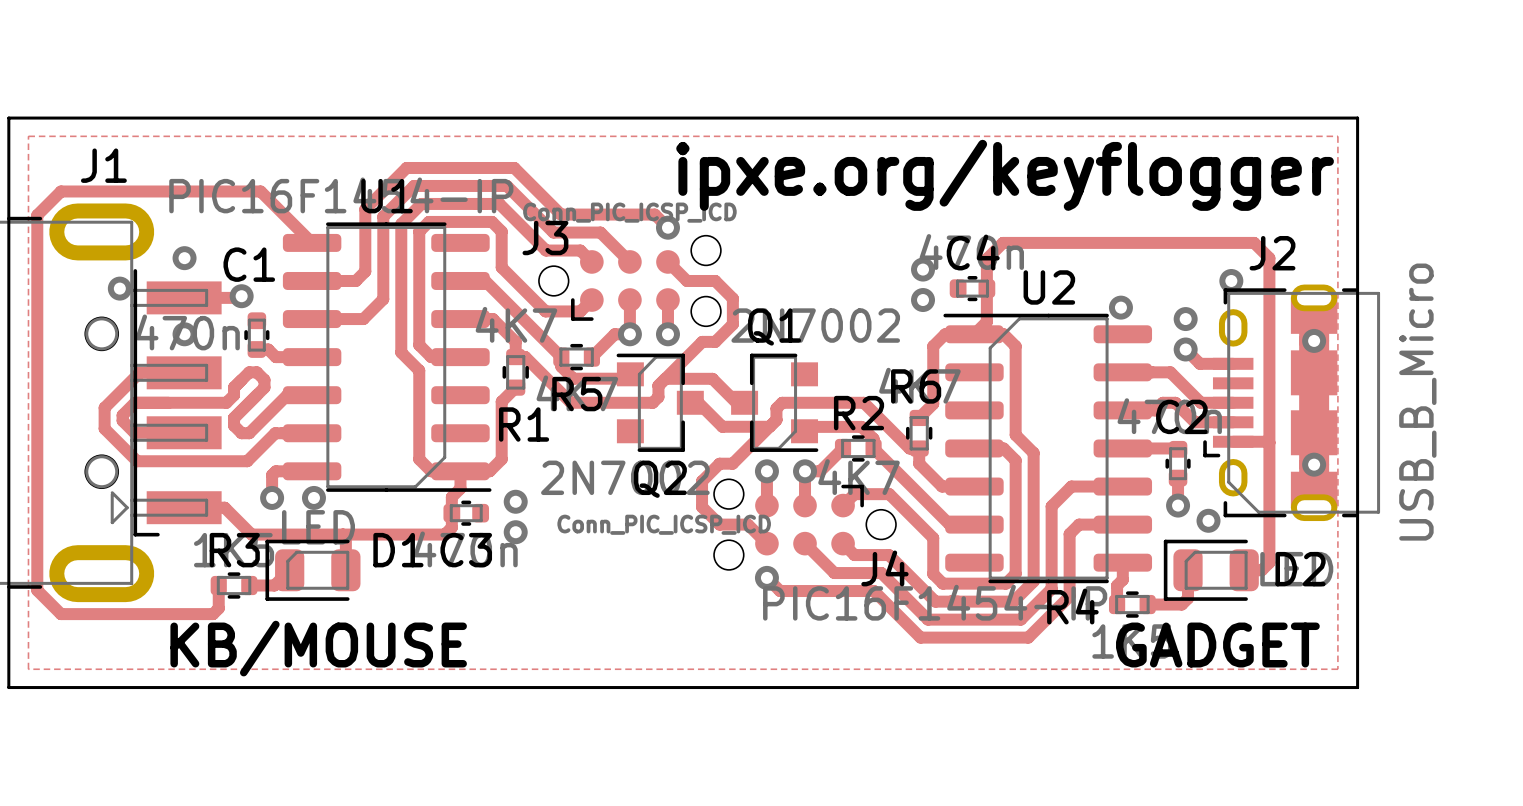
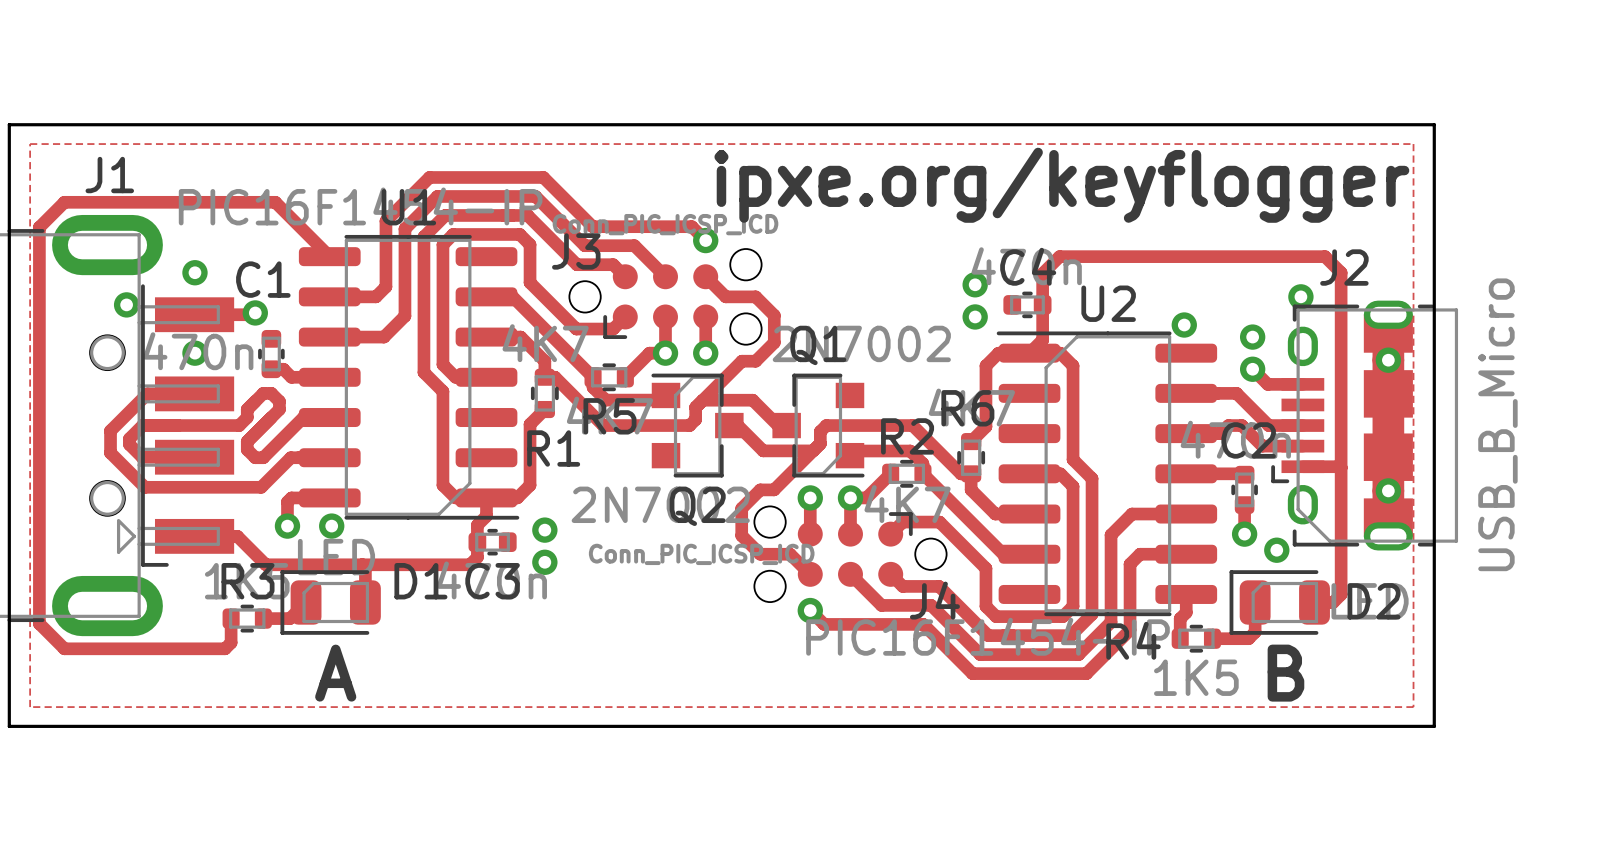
text: GADGET (1217, 645) -> B (1285, 673)
text: KB/MOUSE (318, 648) -> A (335, 673)

